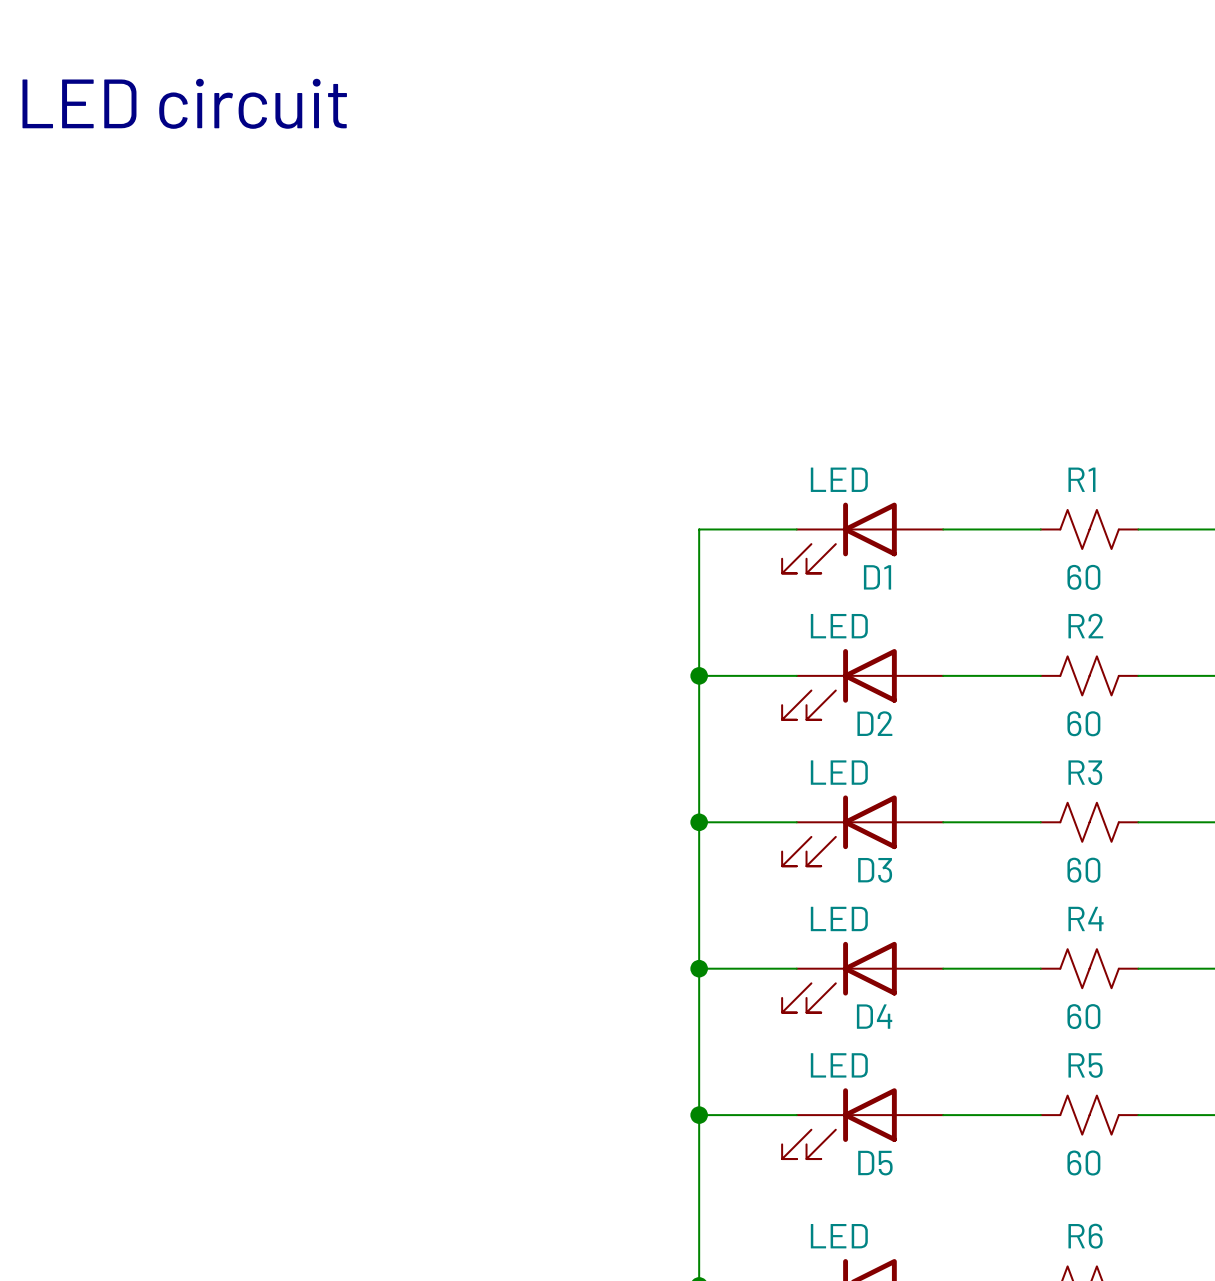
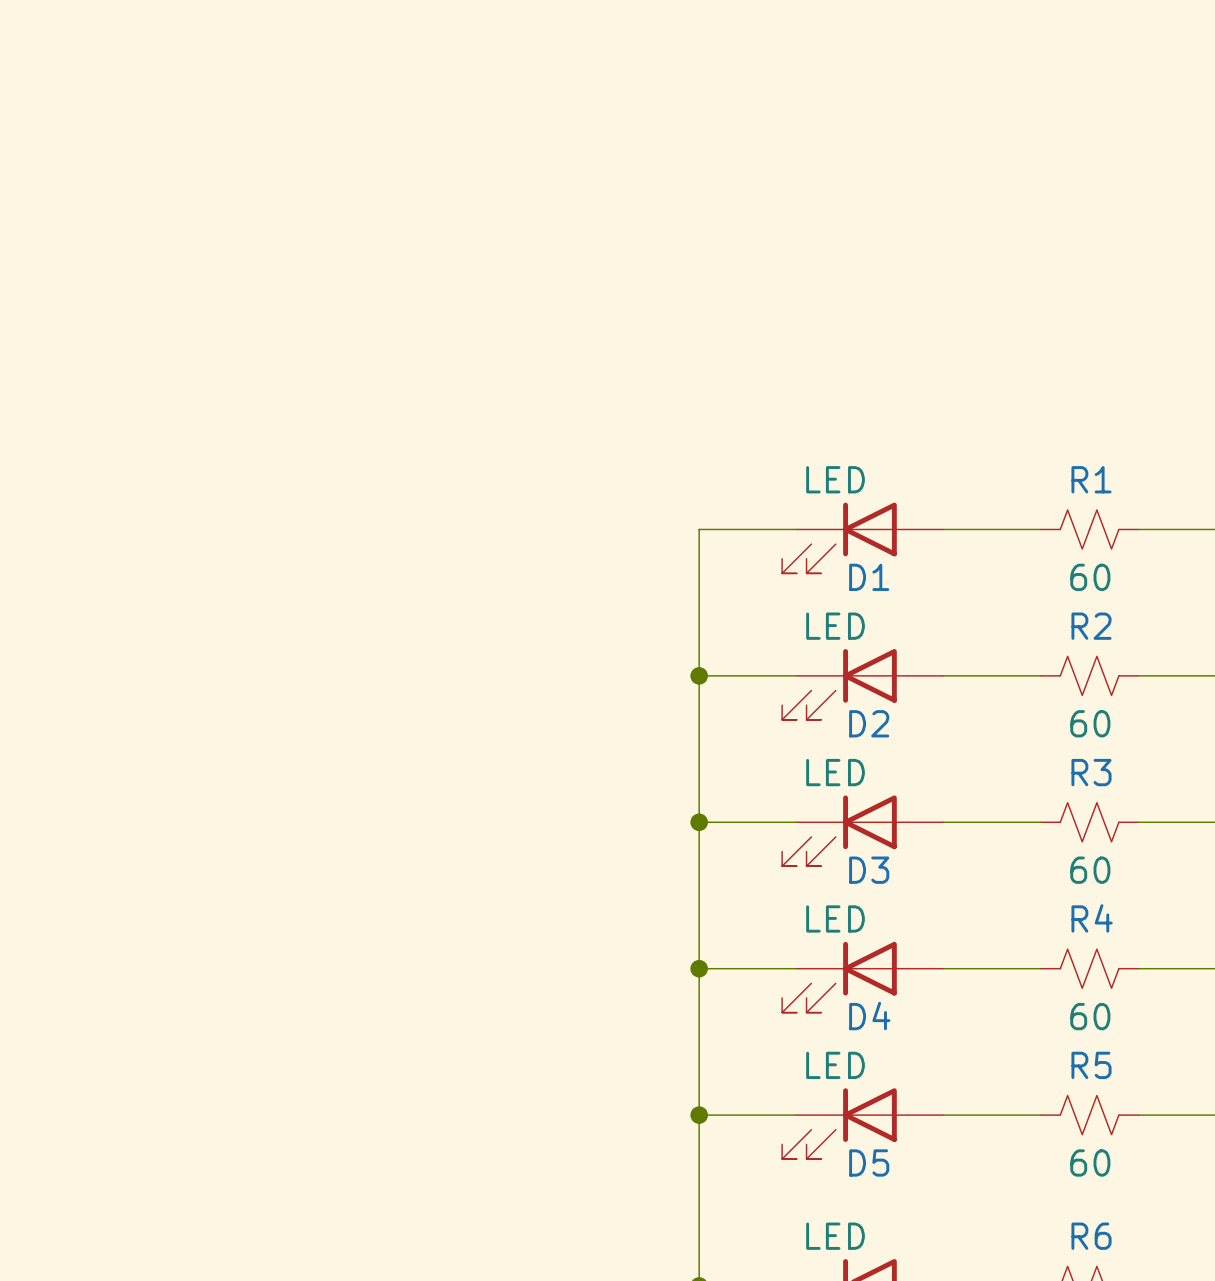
text: LED circuit (184, 103) -> none

